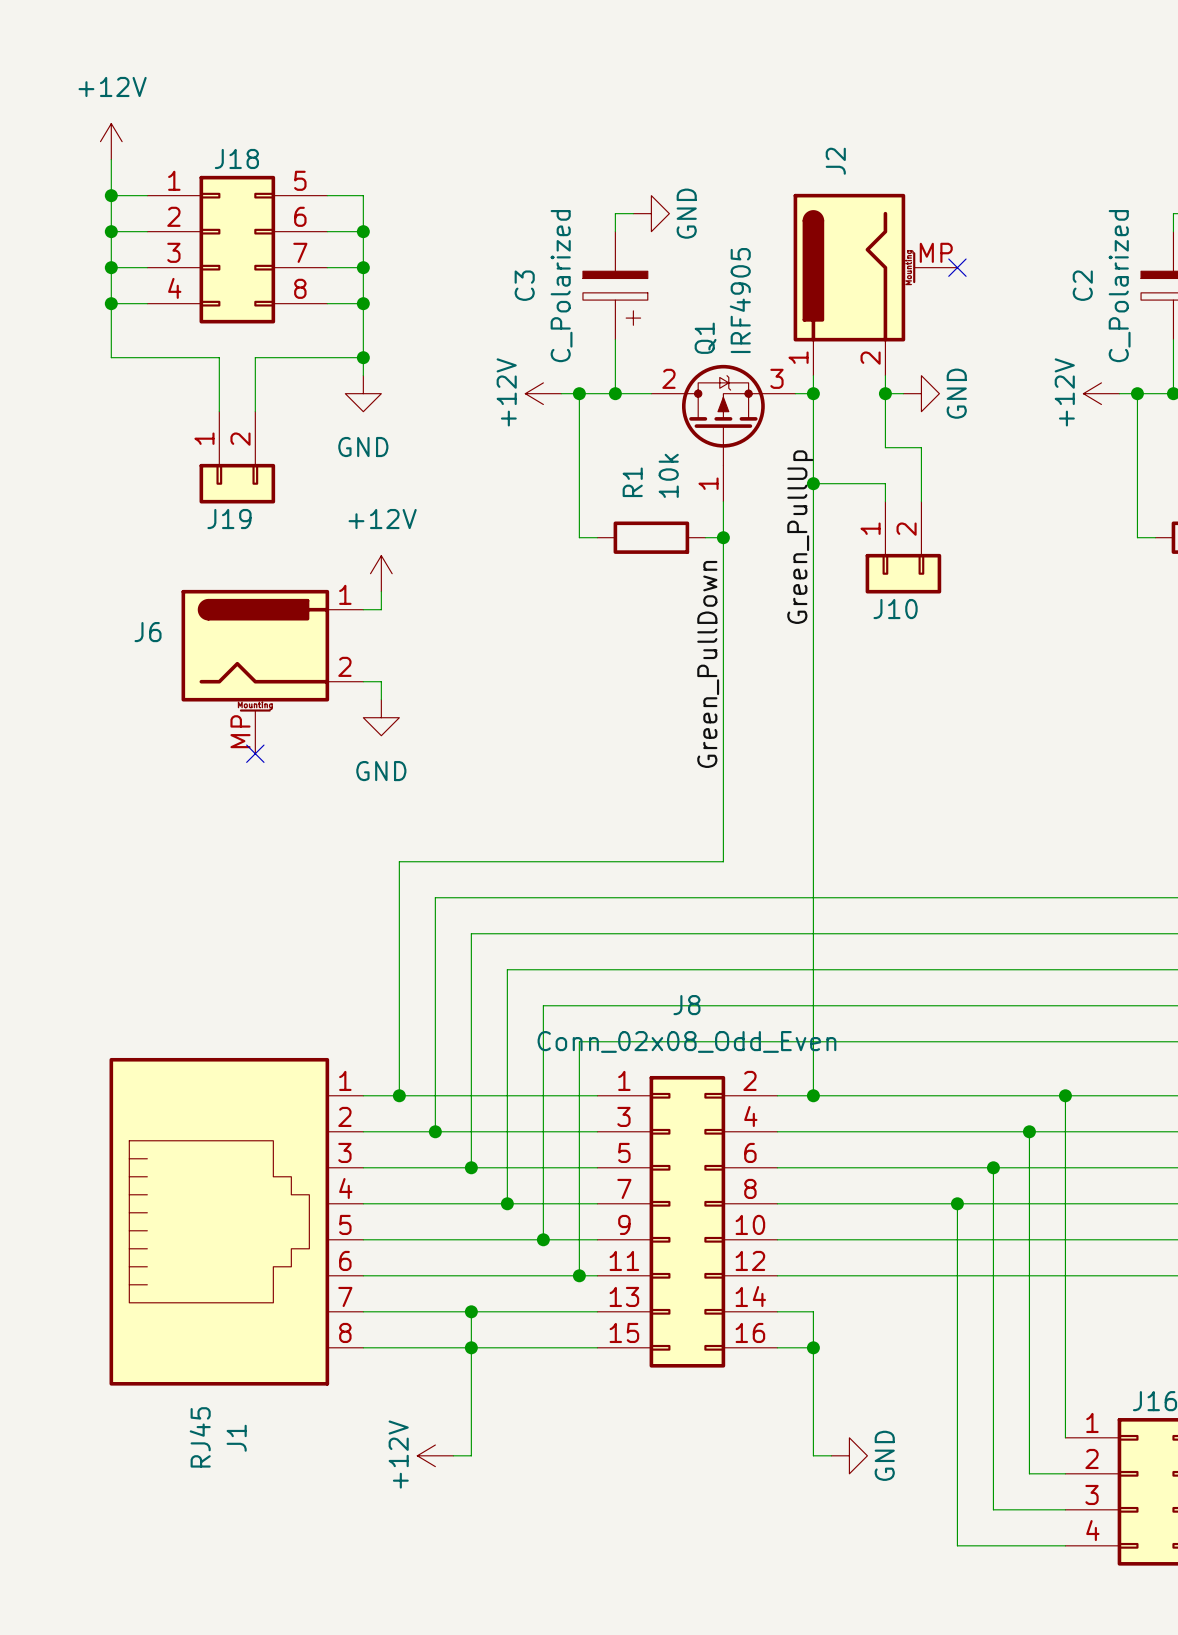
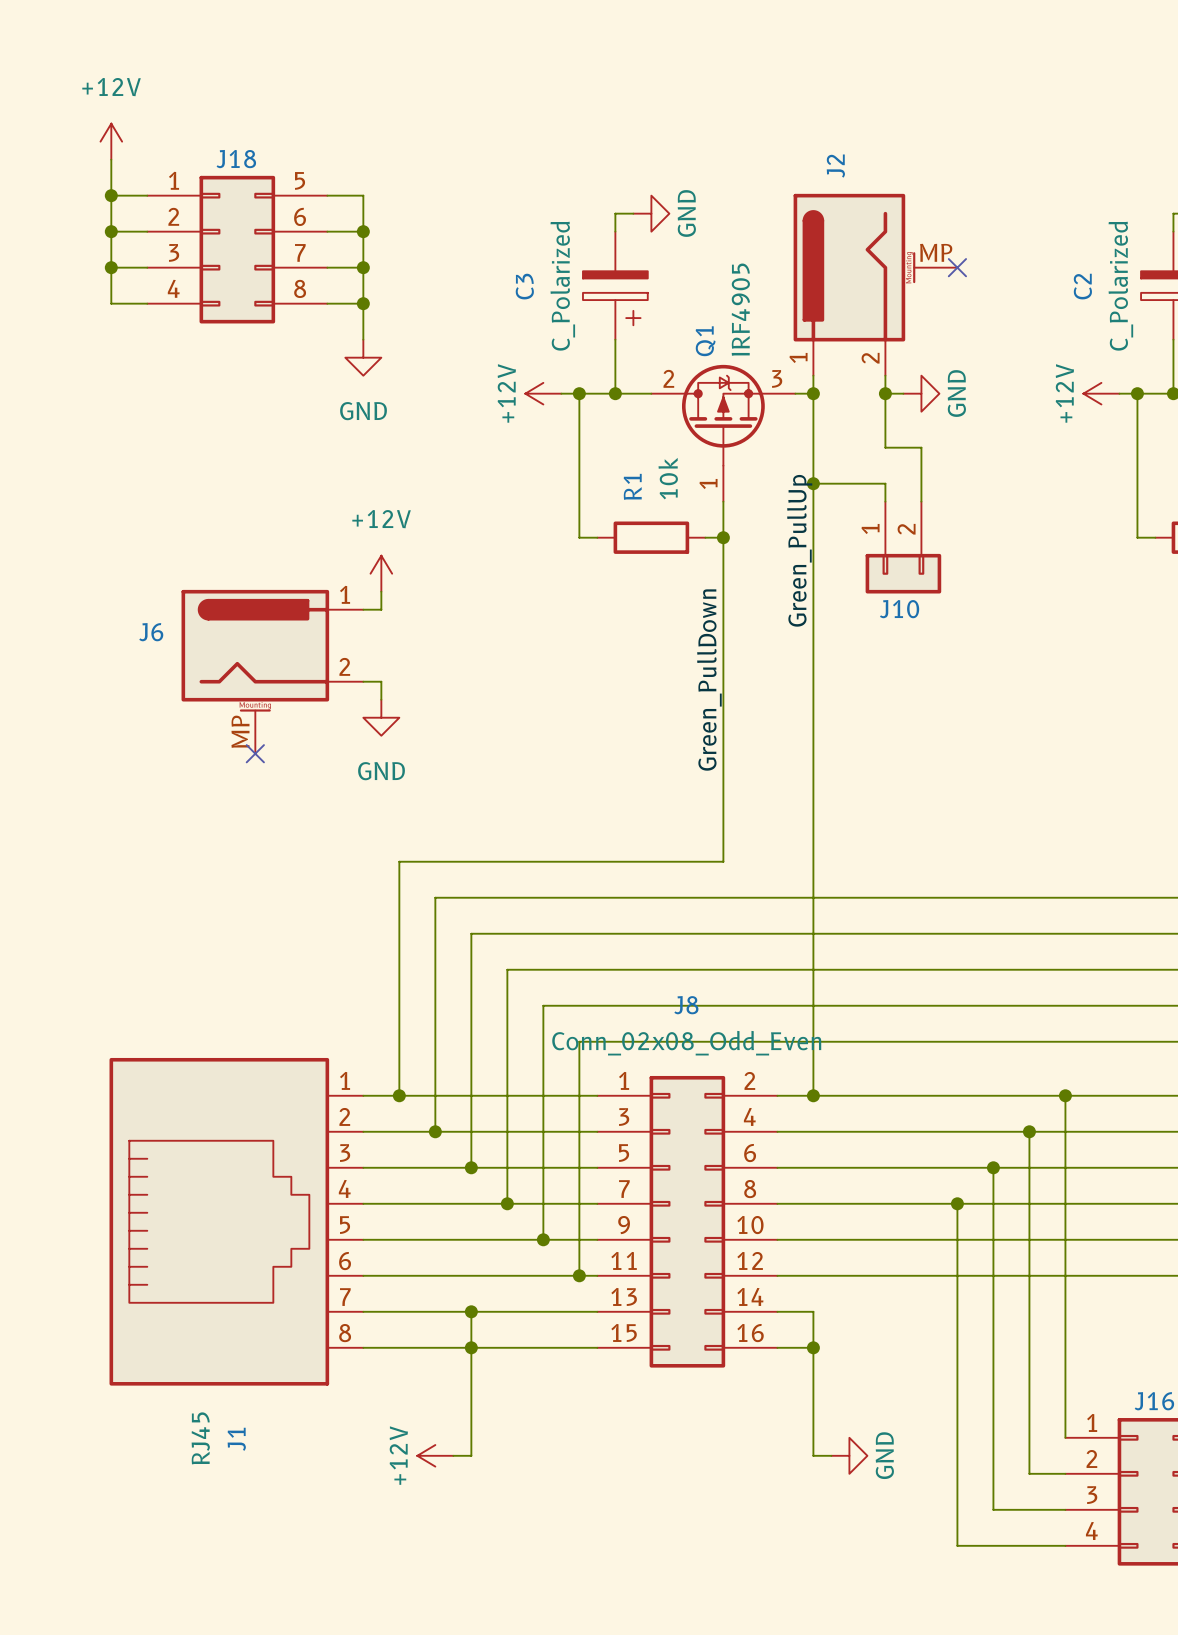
wire: (111, 303) (111, 357) (219, 357) (219, 411) -> none
junction: (111, 303) -> none
wire: (363, 357) (255, 357) (255, 411) -> none
junction: (363, 357) -> none
power symbol position: GND (363, 393) -> GND (363, 357)
J19: (237, 457) -> none

